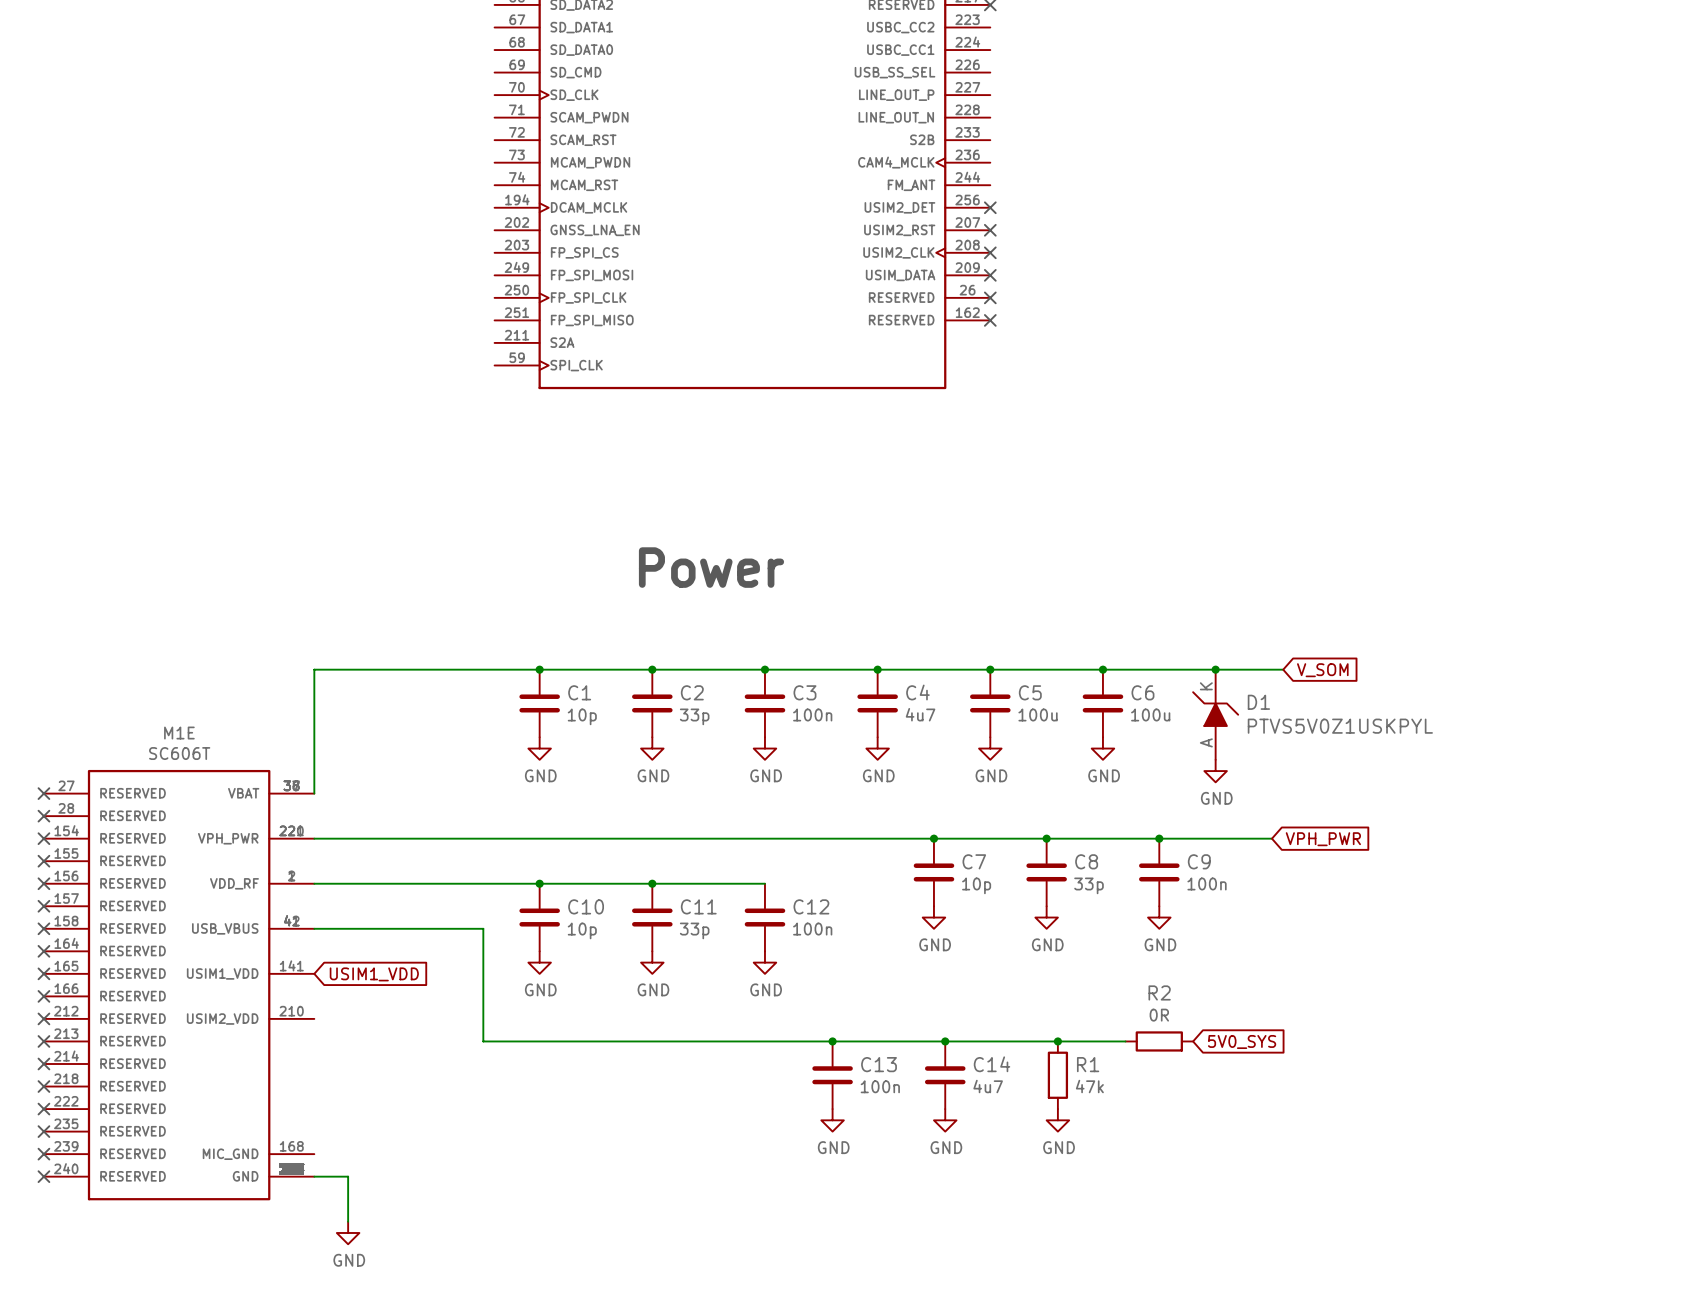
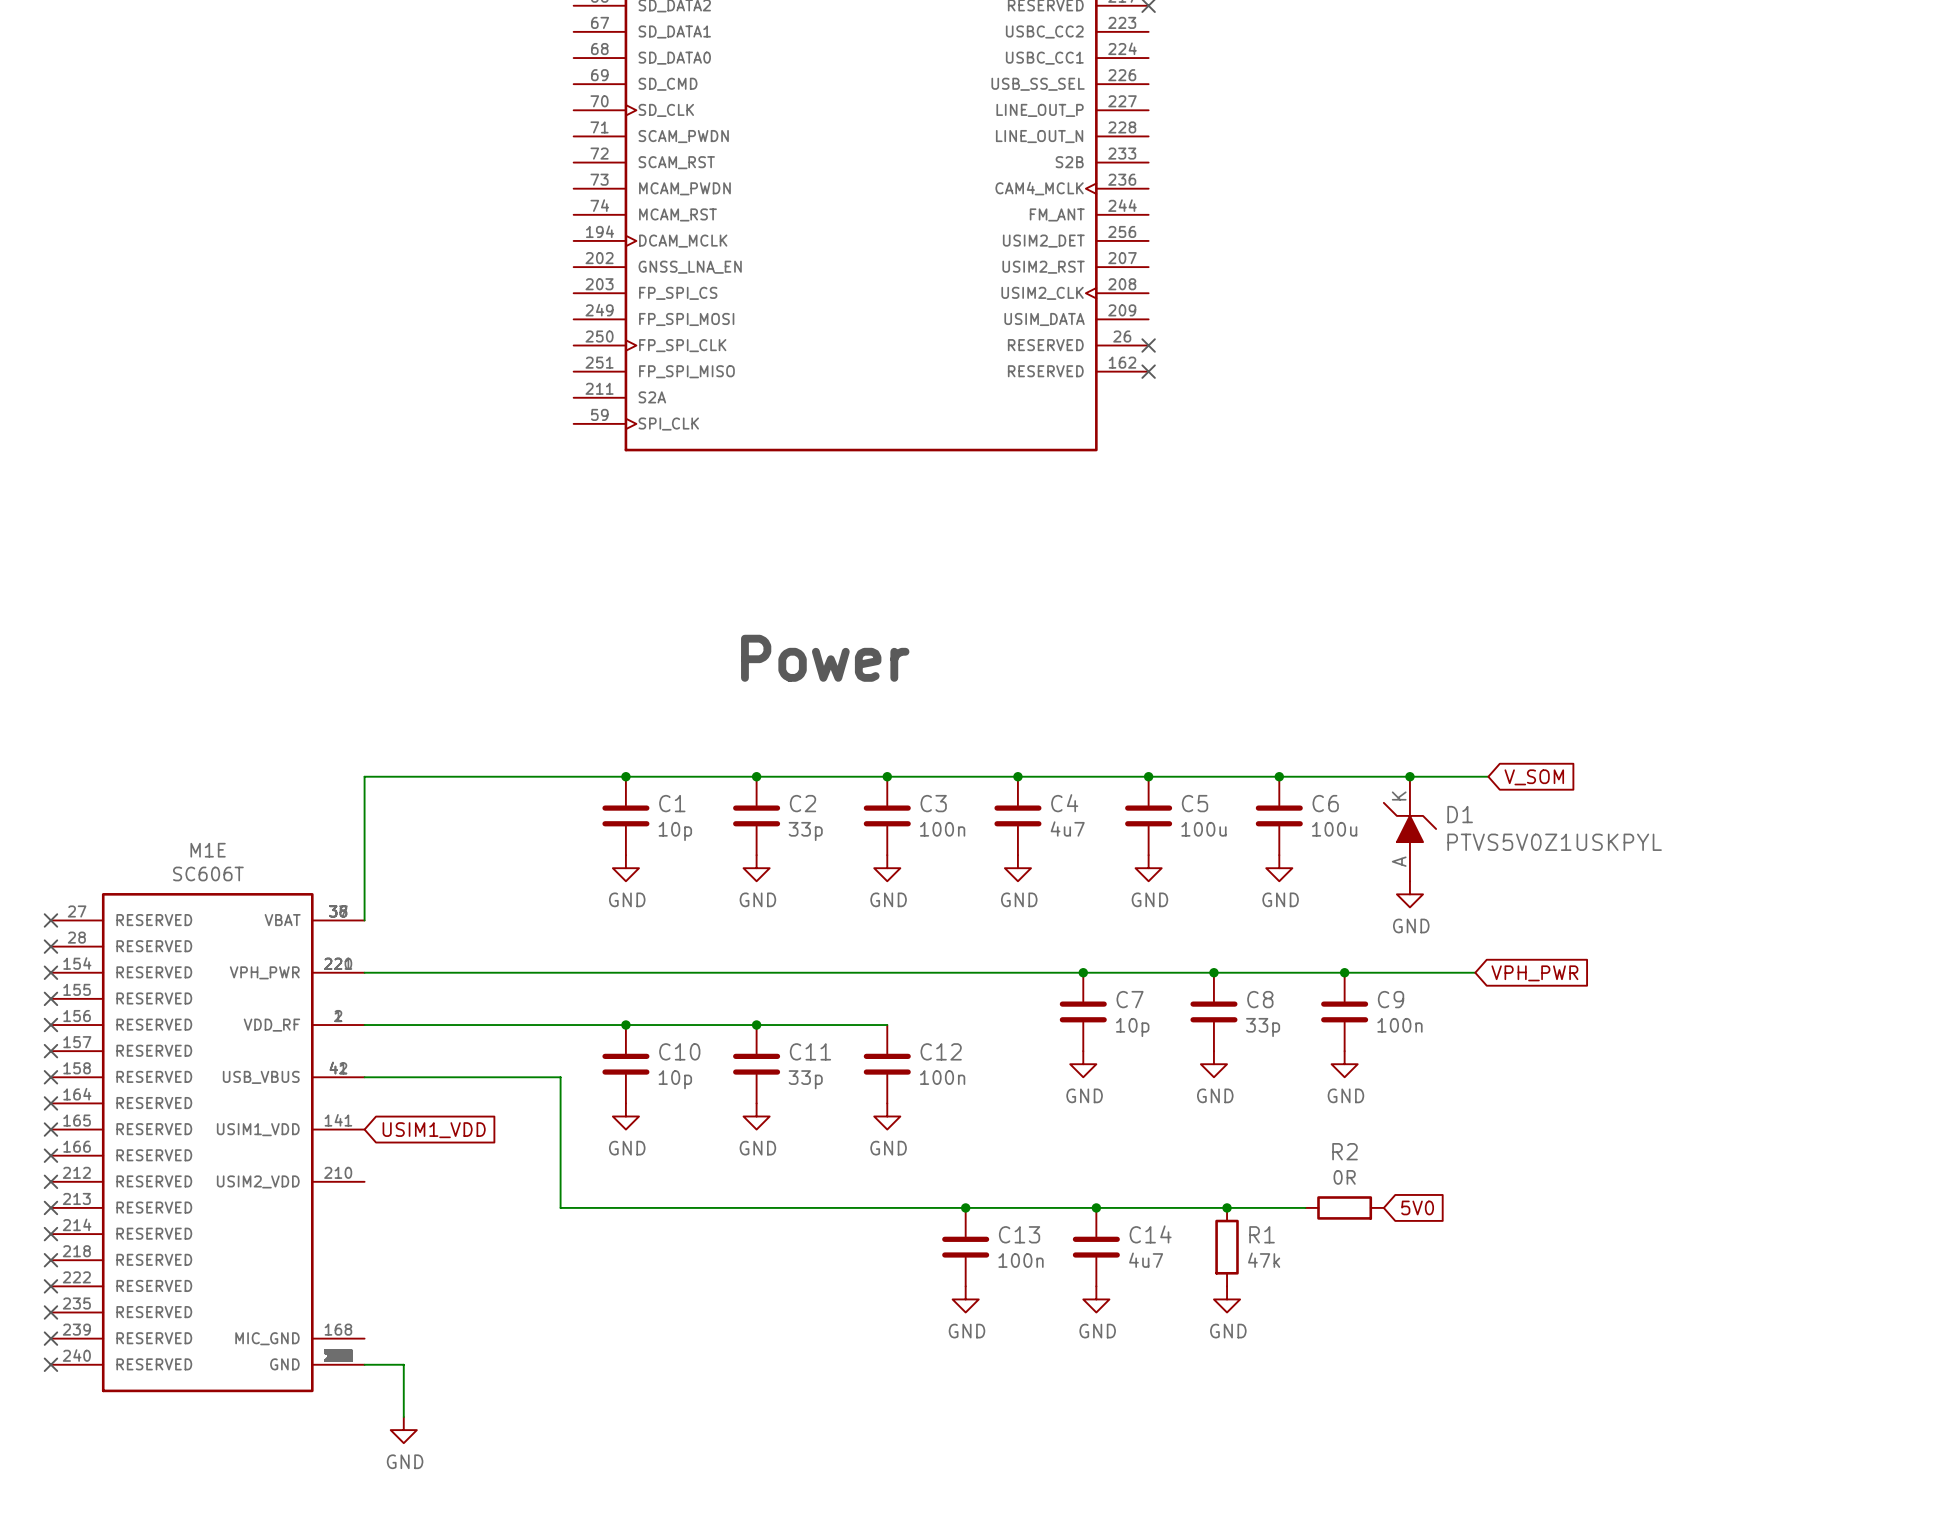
no-connect mark: (990, 207) -> none
no-connect mark: (990, 230) -> none
no-connect mark: (990, 252) -> none
no-connect mark: (990, 275) -> none
global label: 5V0_SYS (1242, 1042) -> 5V0 (1417, 1207)

